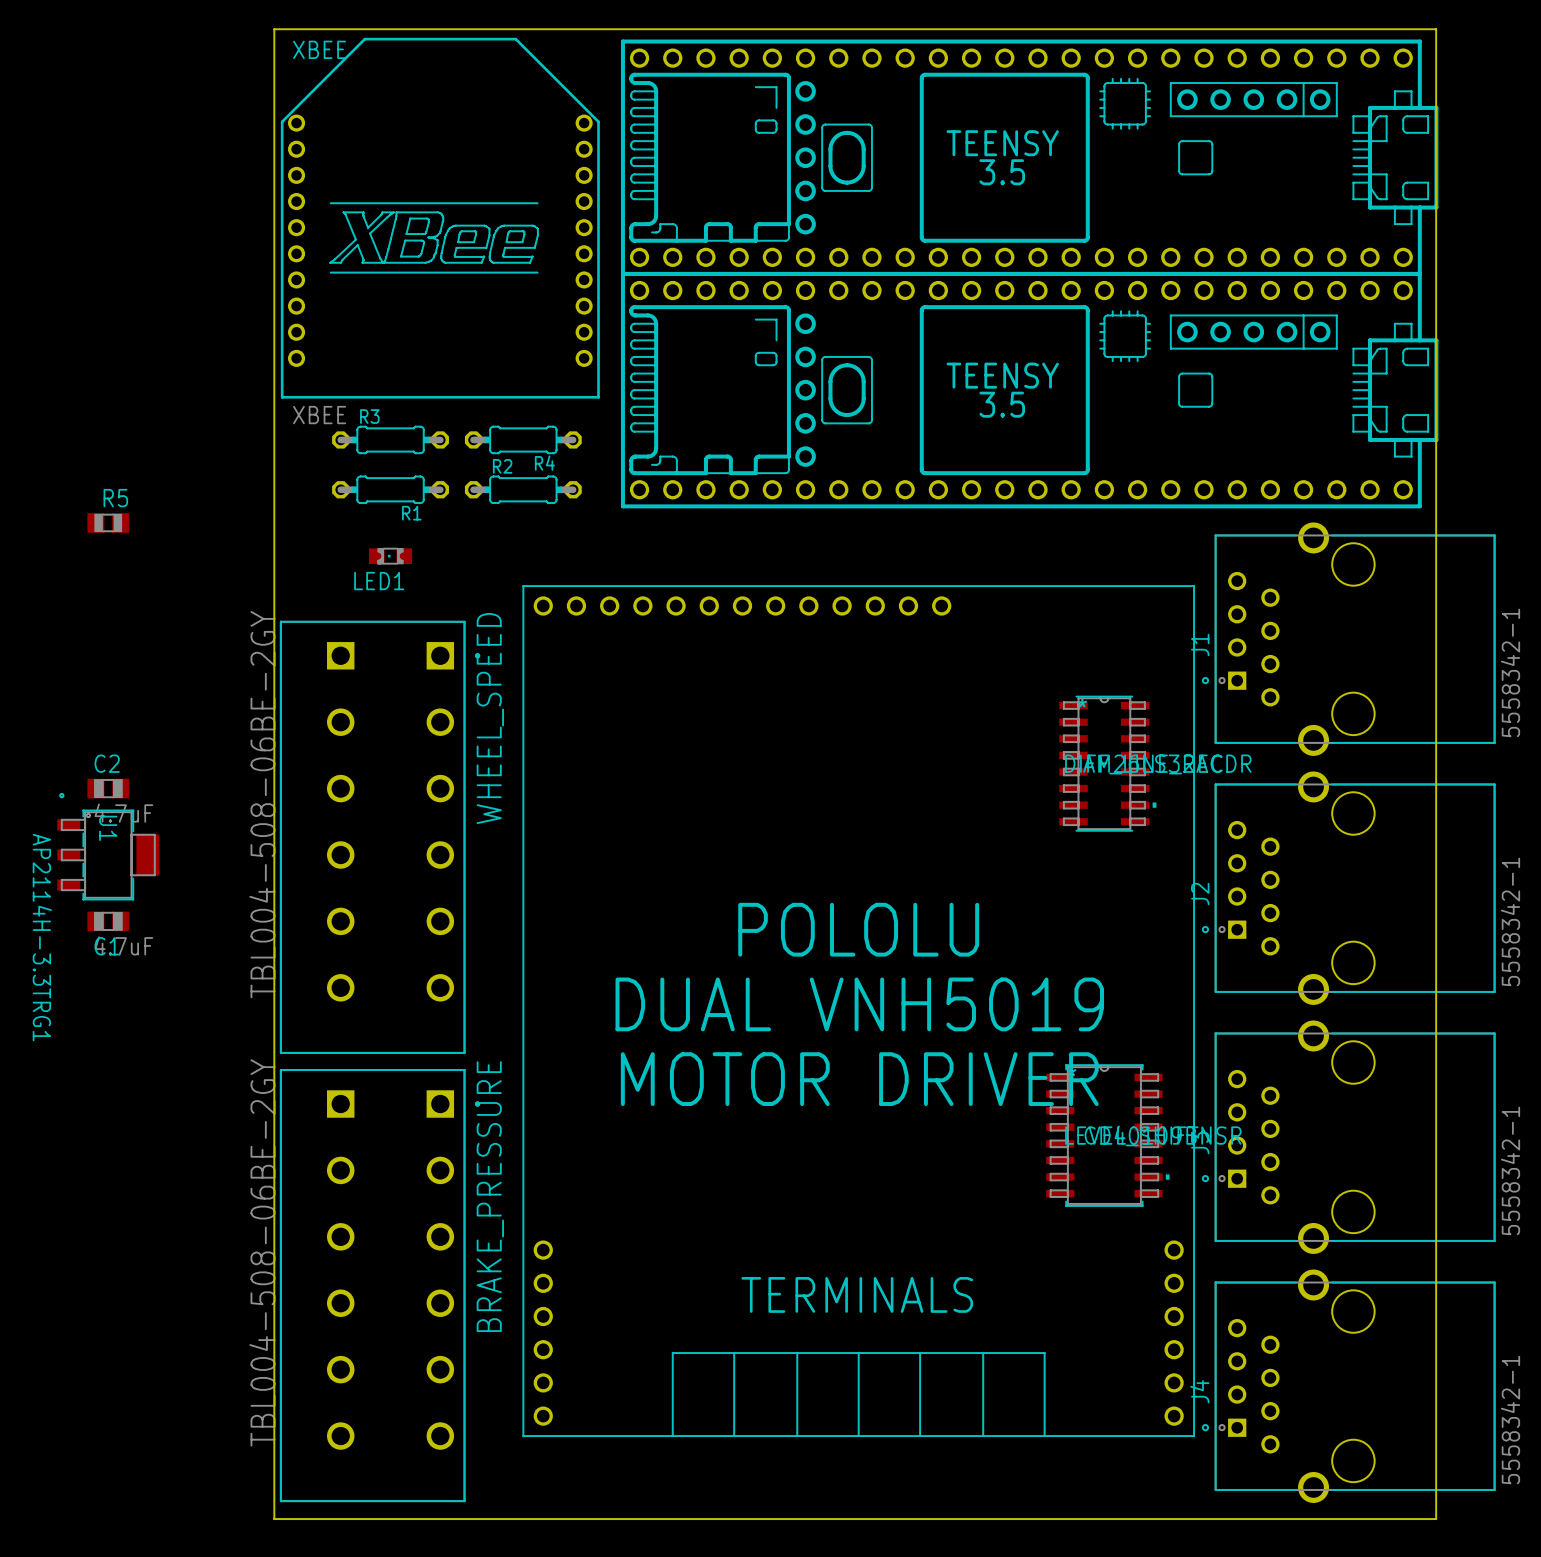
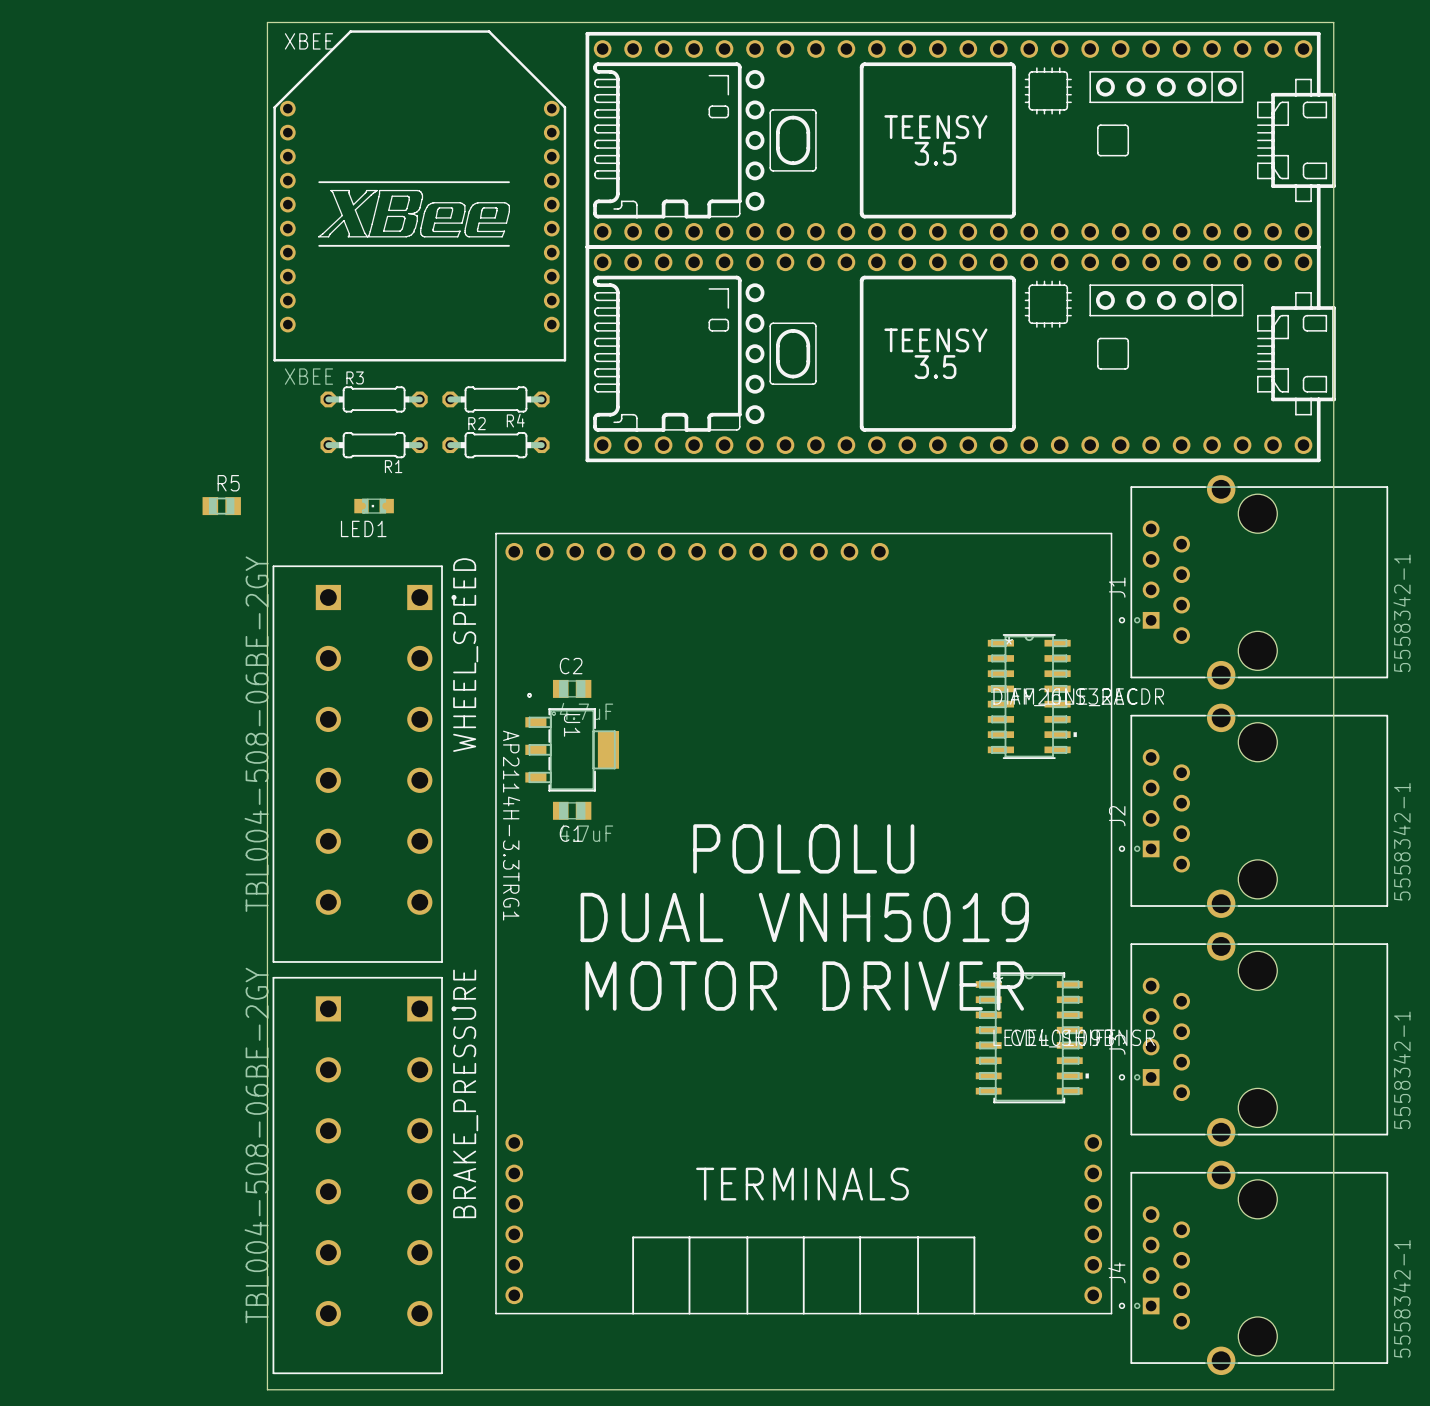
R5 position: (108, 522) -> (221, 506)
C2 position: (108, 788) -> (572, 688)
U1 position: (108, 846) -> (572, 742)
C1 position: (108, 921) -> (572, 810)

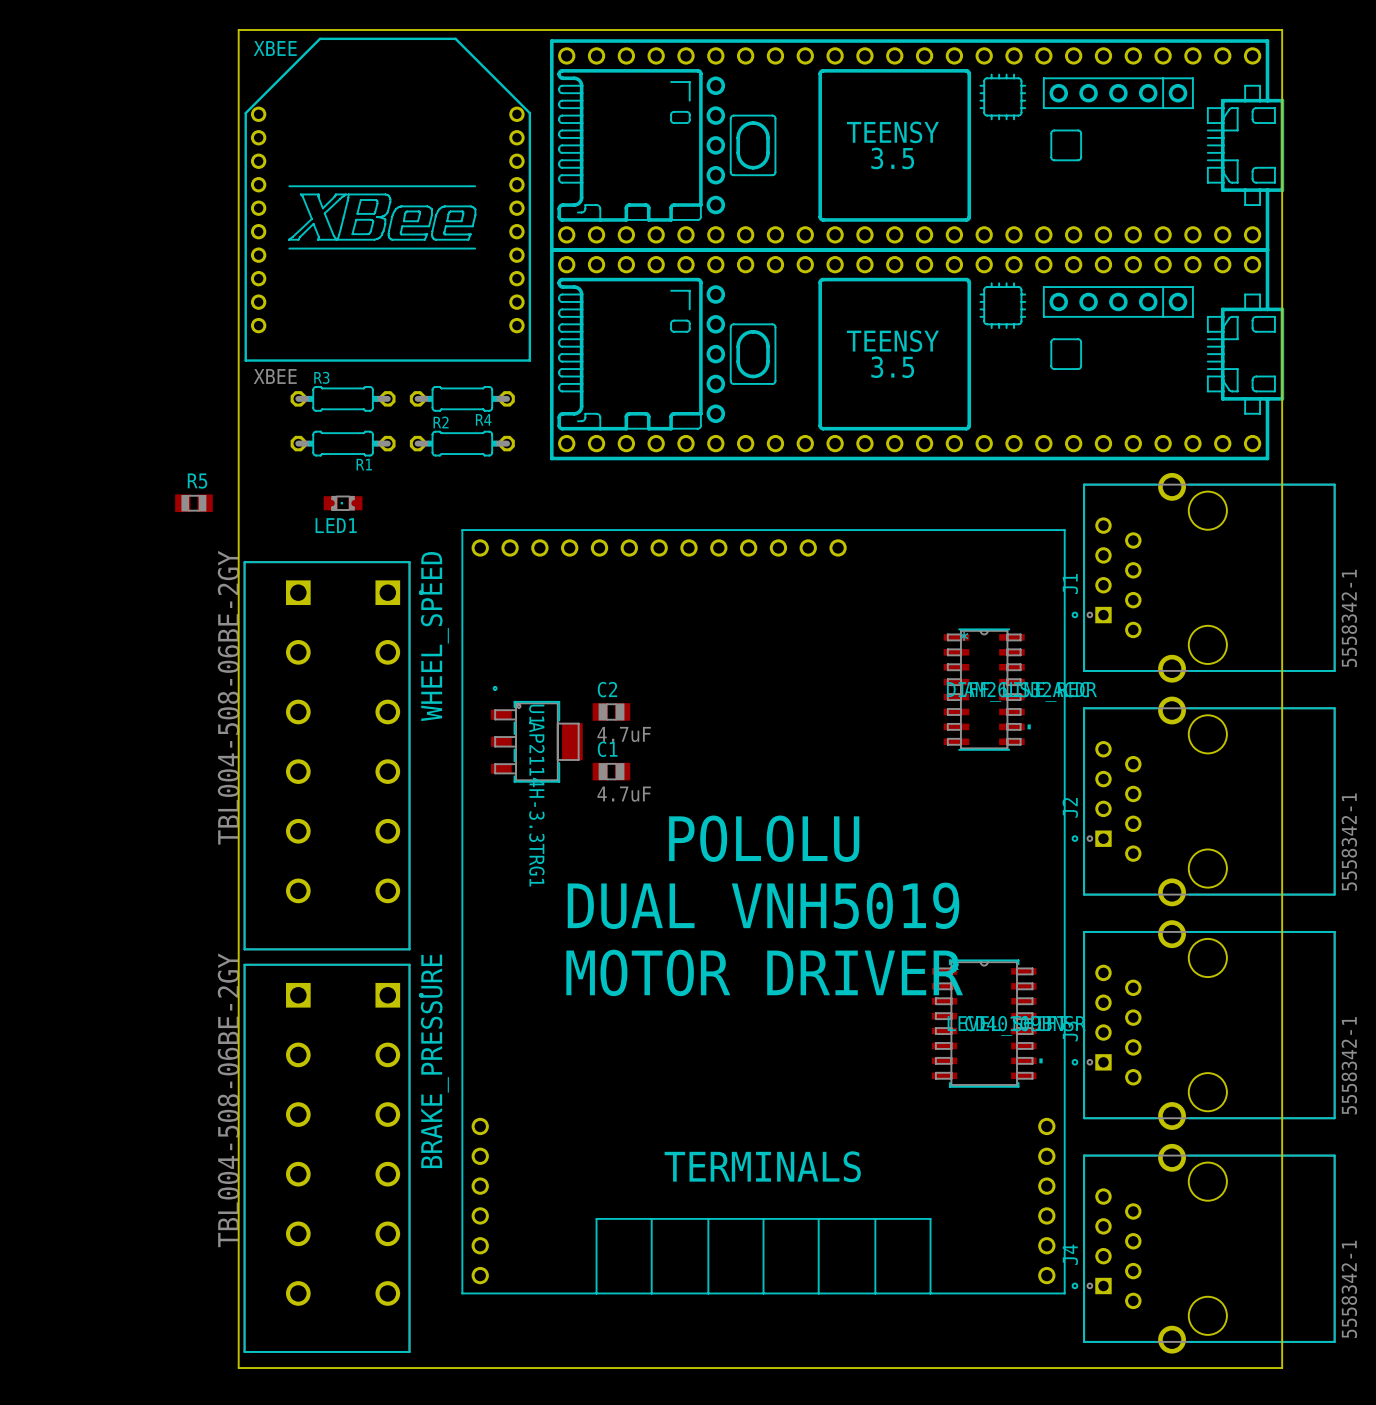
C2 position: (572, 688) -> (611, 711)
C1 position: (572, 810) -> (611, 771)
U1 value position: AP2114H-3.3TRG1 (511, 825) -> AP2114H-3.3TRG1 (536, 804)
C1 name position: C1 (571, 833) -> C1 (607, 749)

